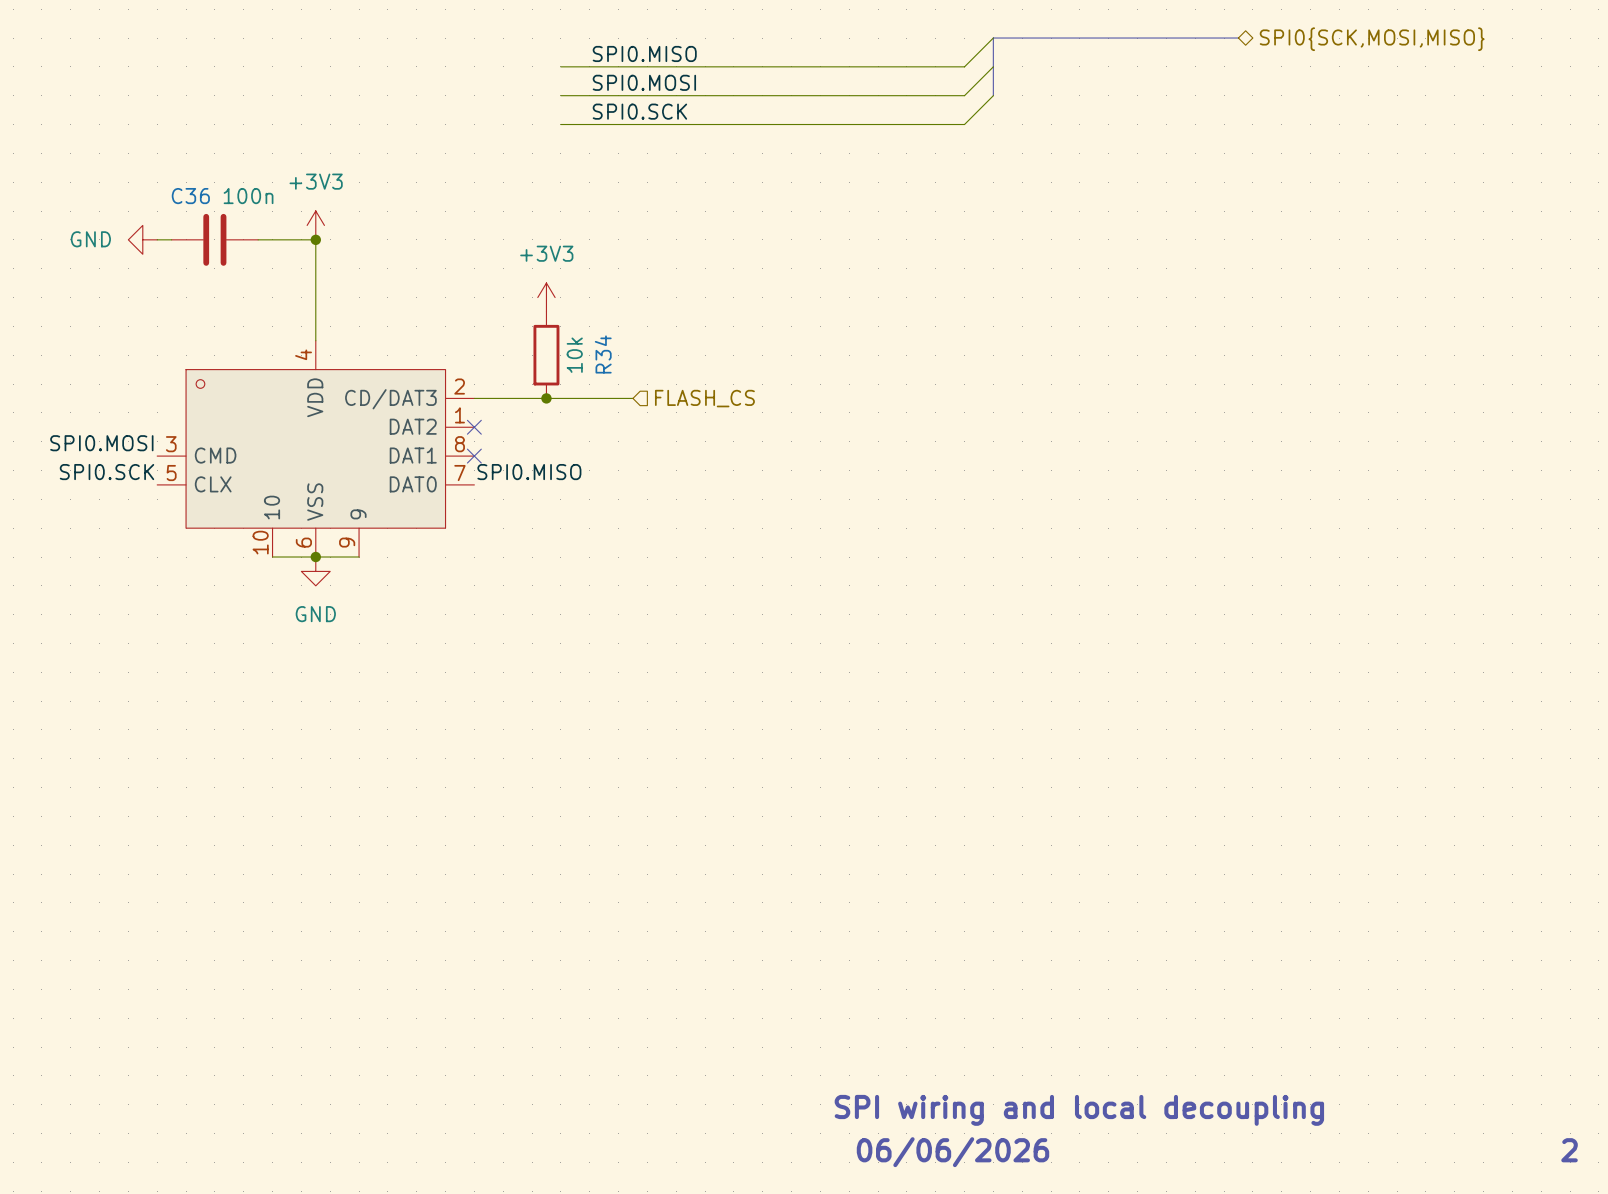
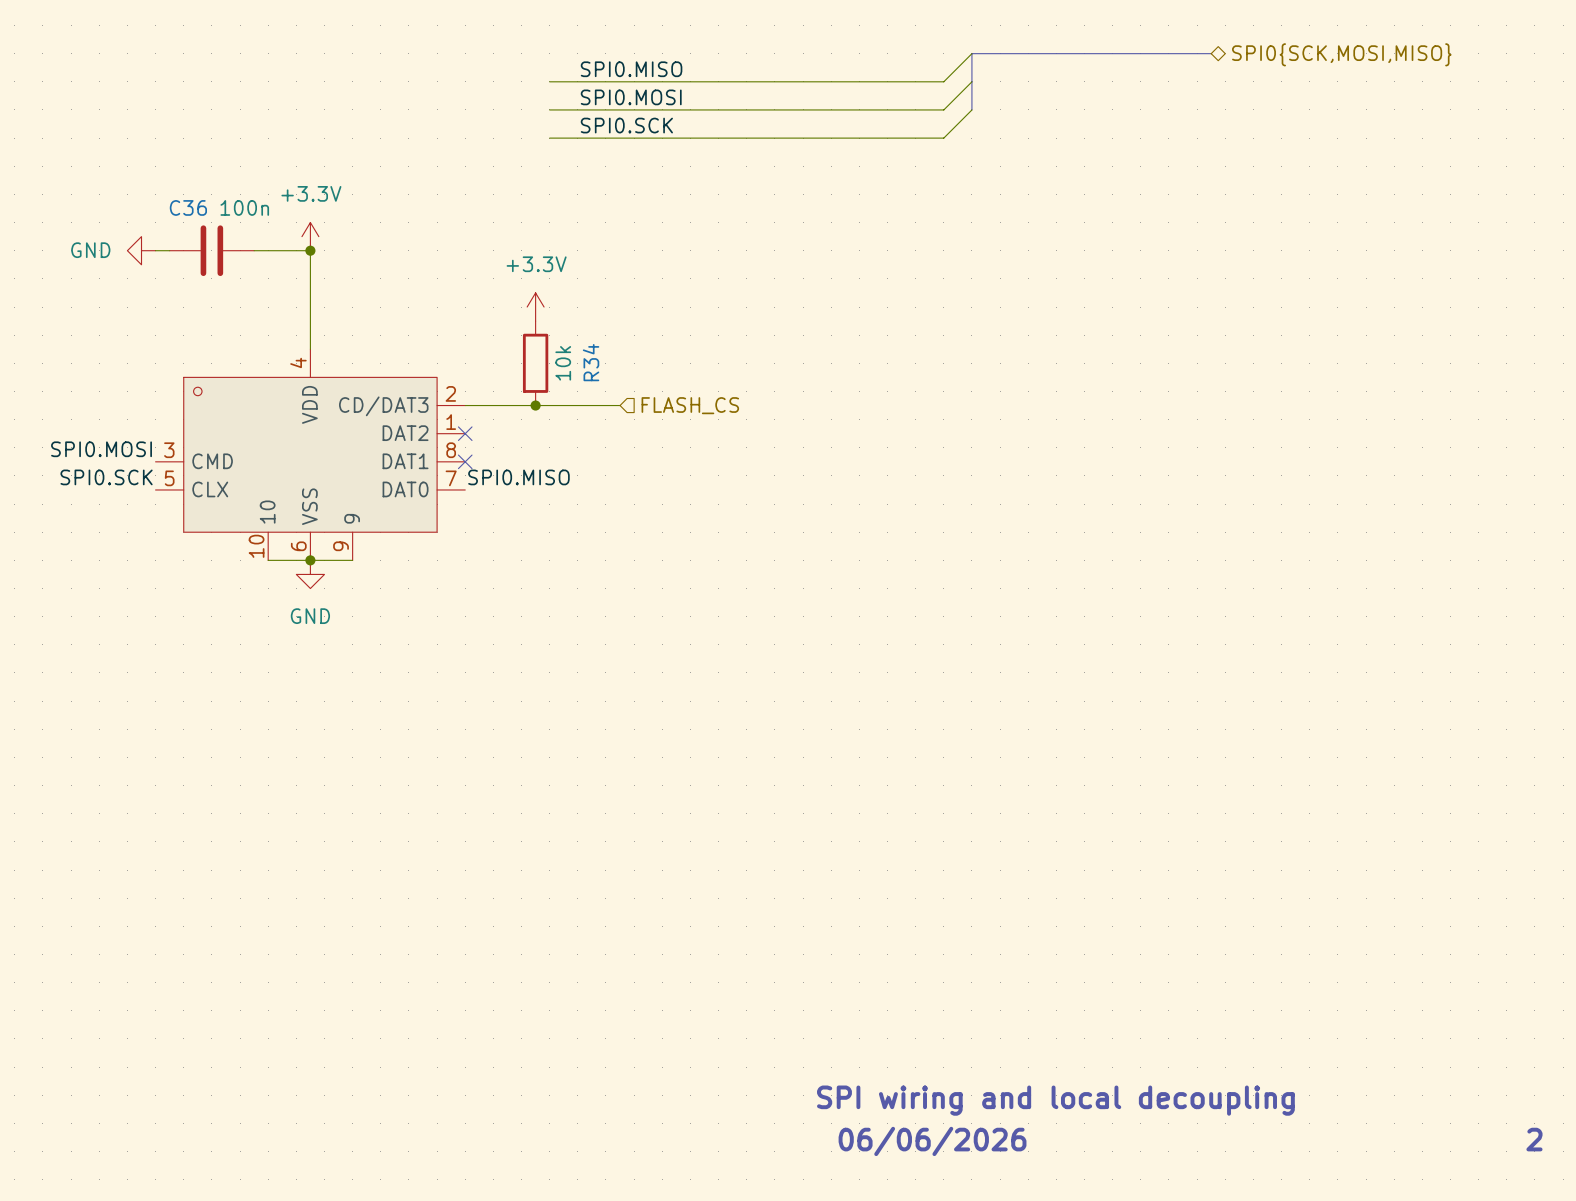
power symbol: +3V3 (315, 225) -> +3.3V (310, 236)
power symbol: +3V3 (546, 297) -> +3.3V (535, 307)

